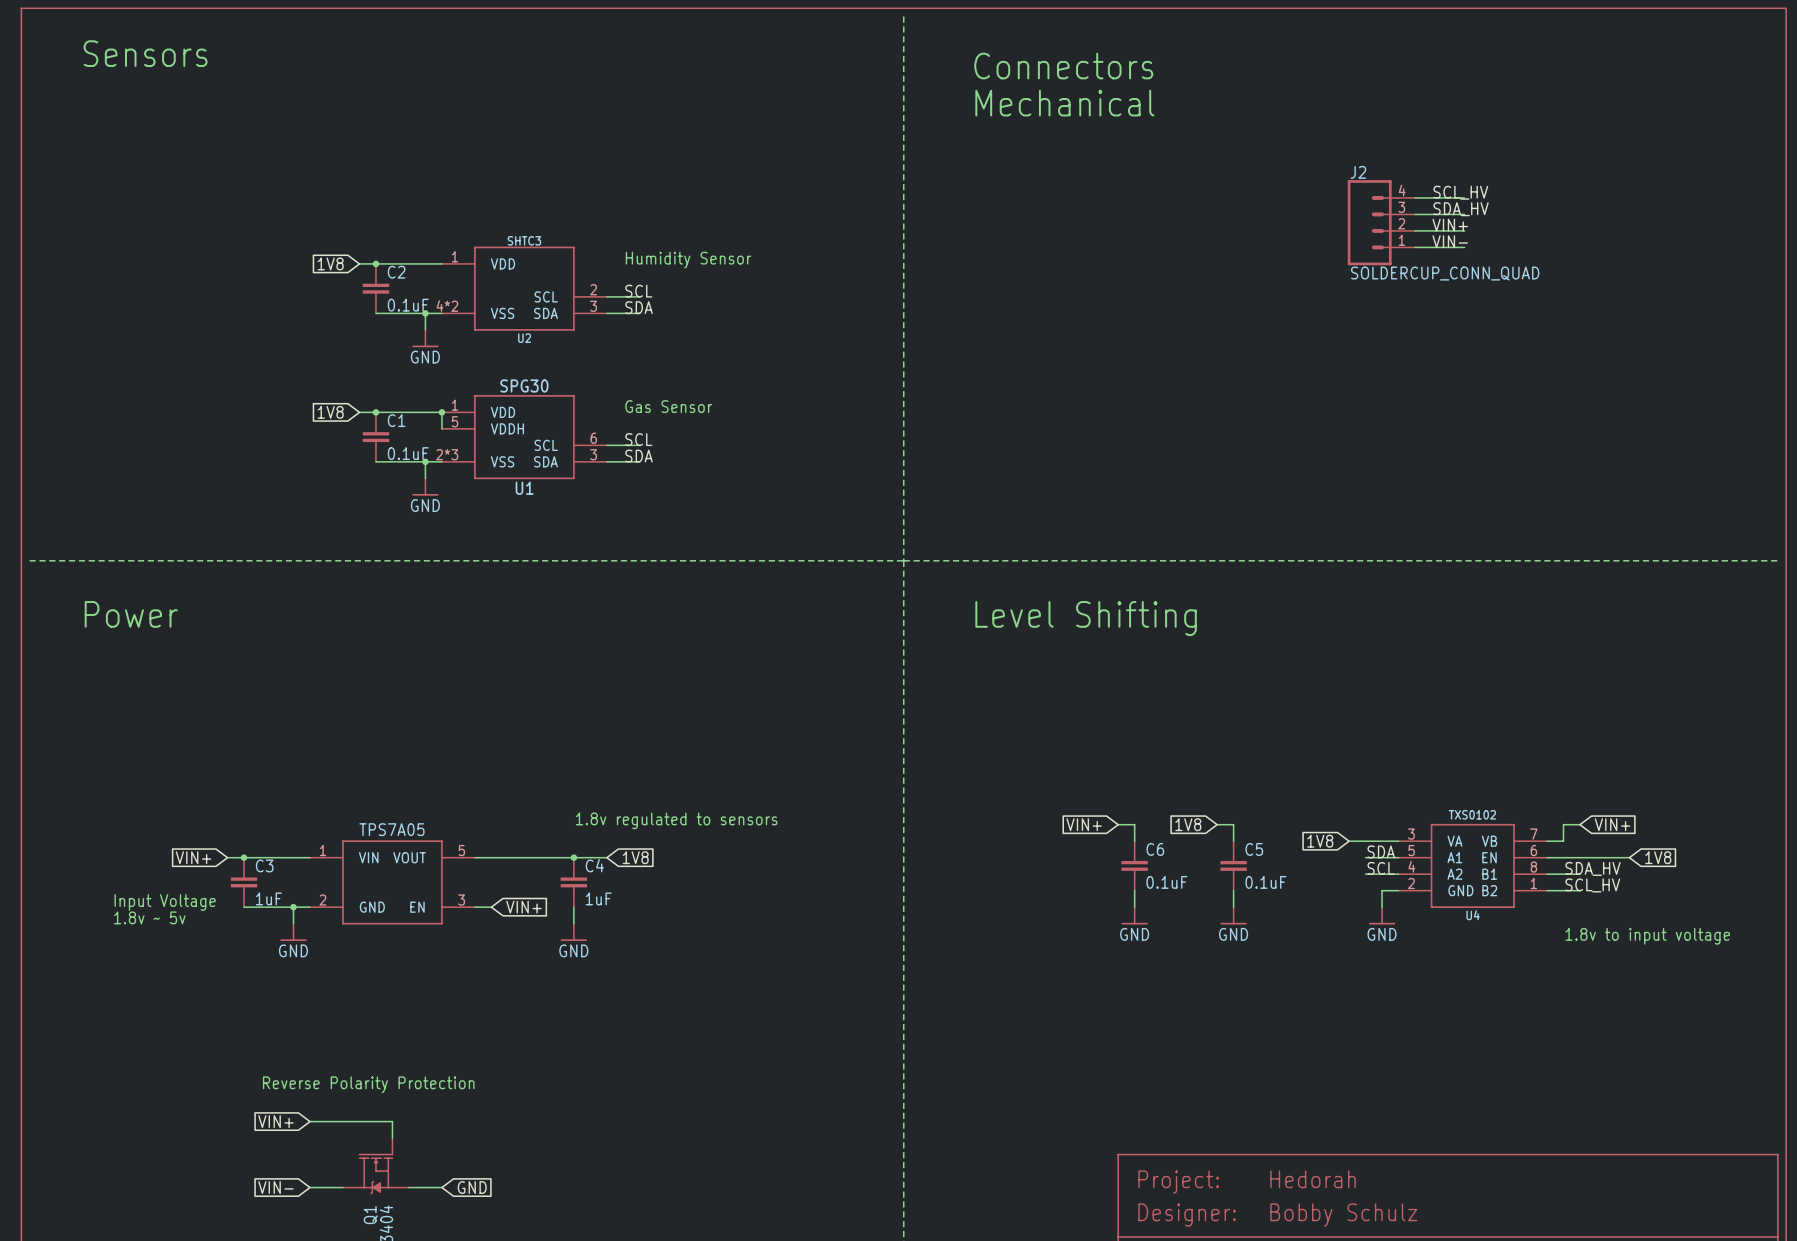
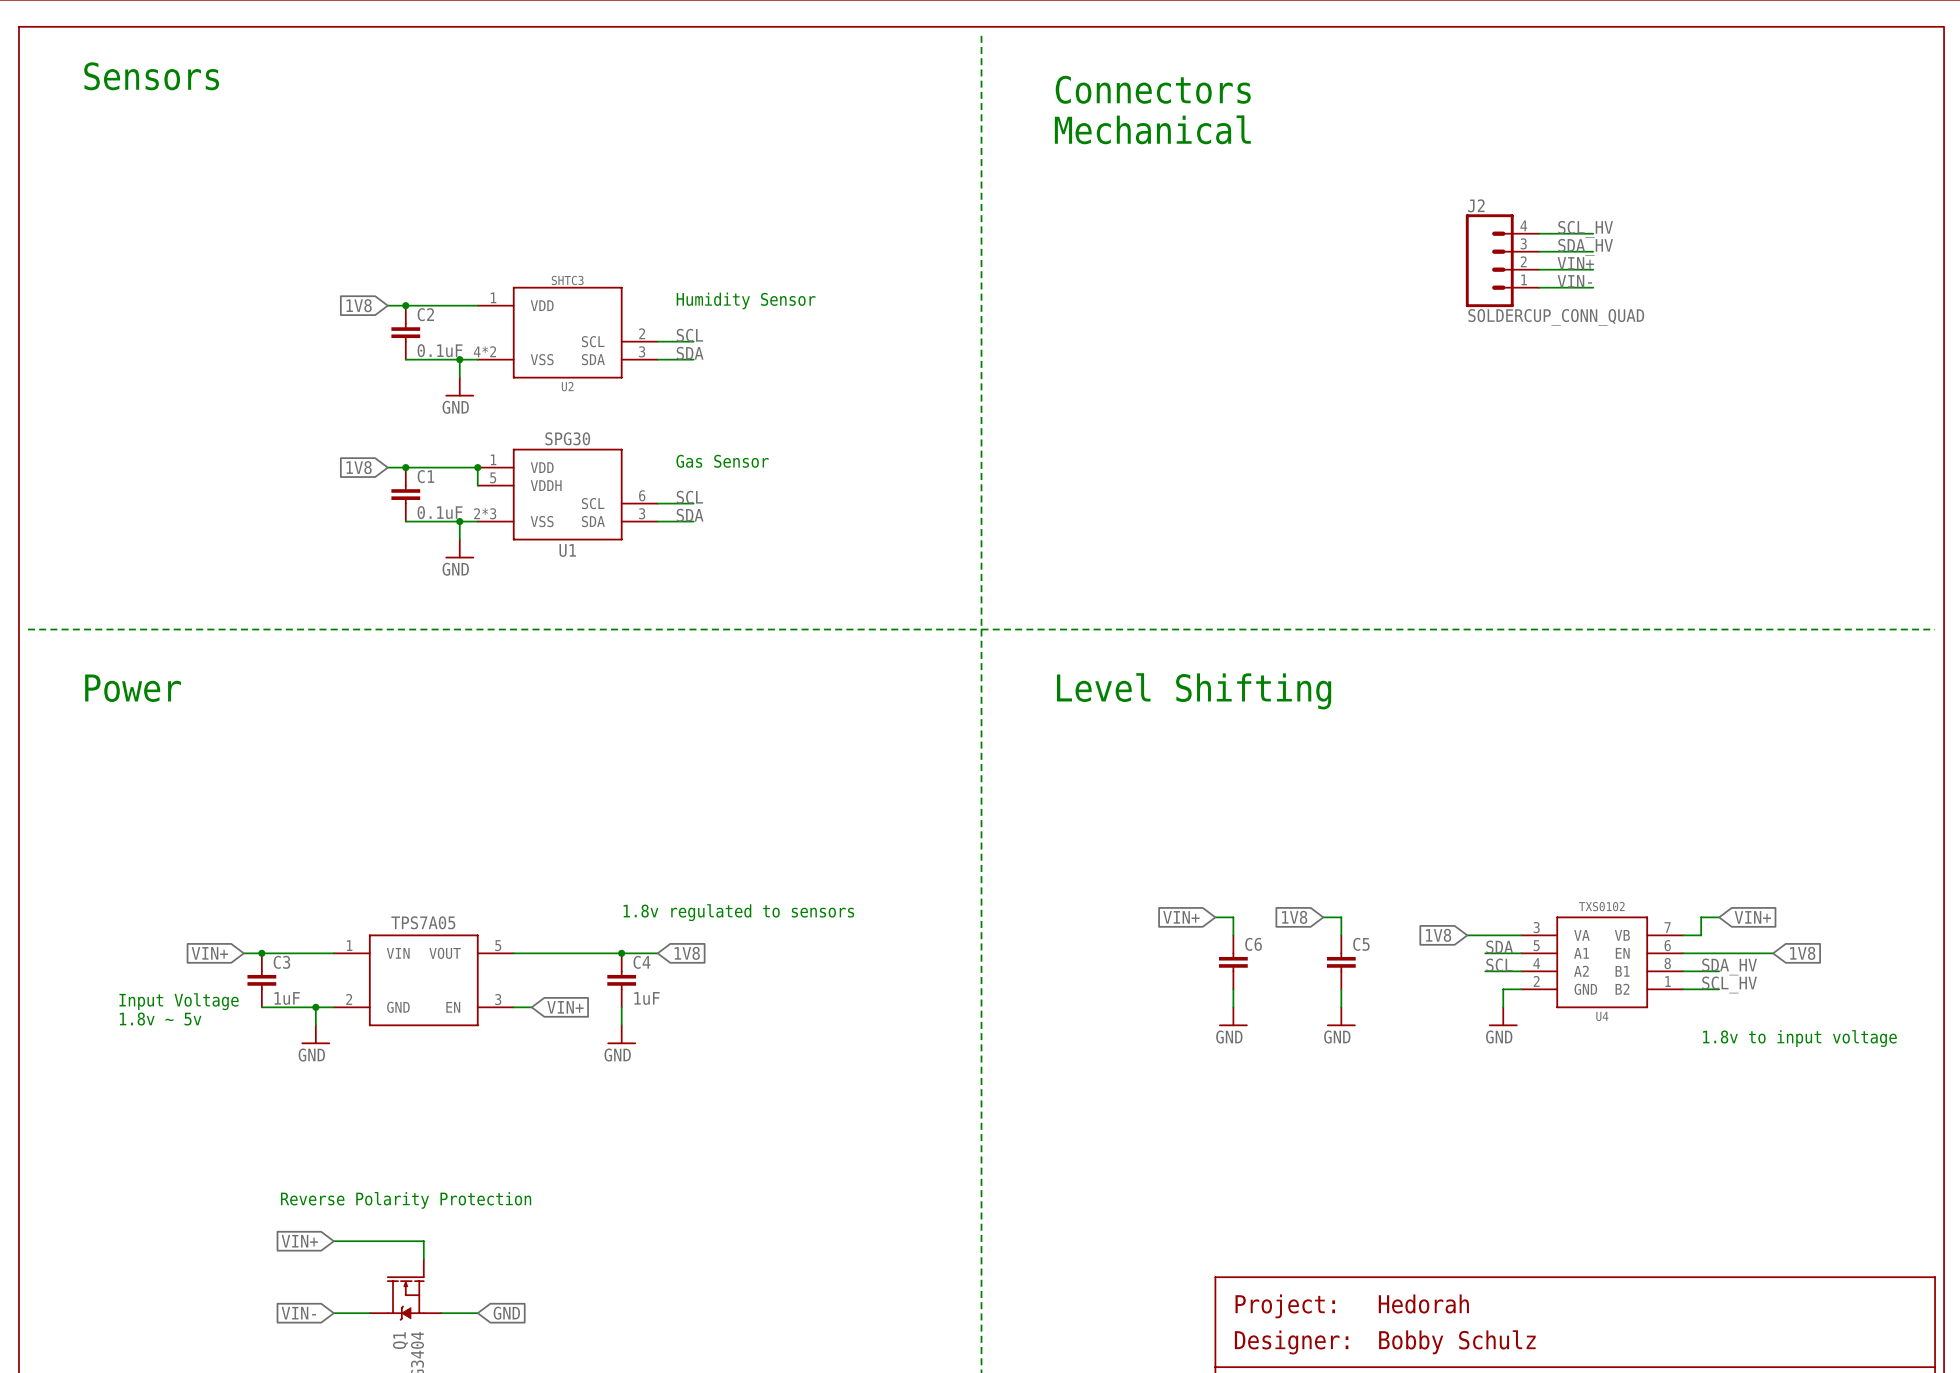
C6 value: 0.1uF (1166, 882) -> none
C5 value: 0.1uF (1265, 882) -> none

